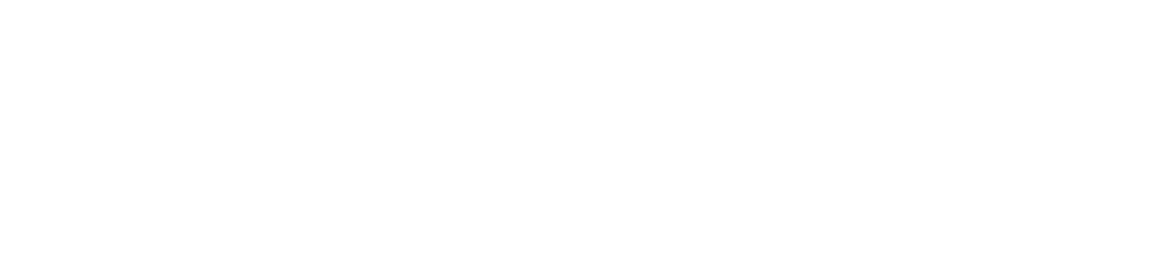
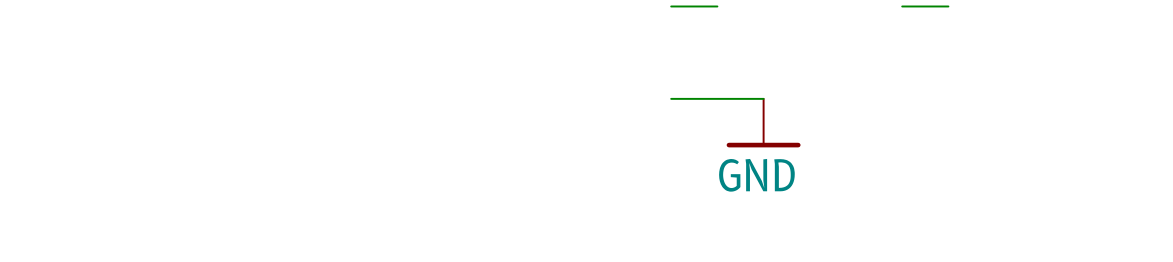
wire: none -> (671, 6) (717, 6)
wire: none -> (902, 6) (948, 6)
wire: none -> (671, 98) (763, 98)
power symbol: none -> GND (763, 123)

